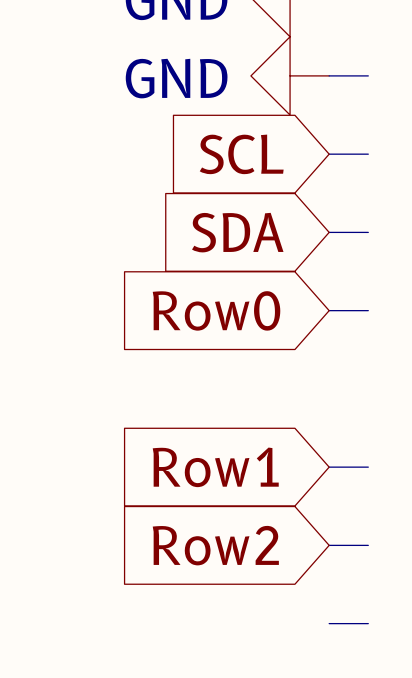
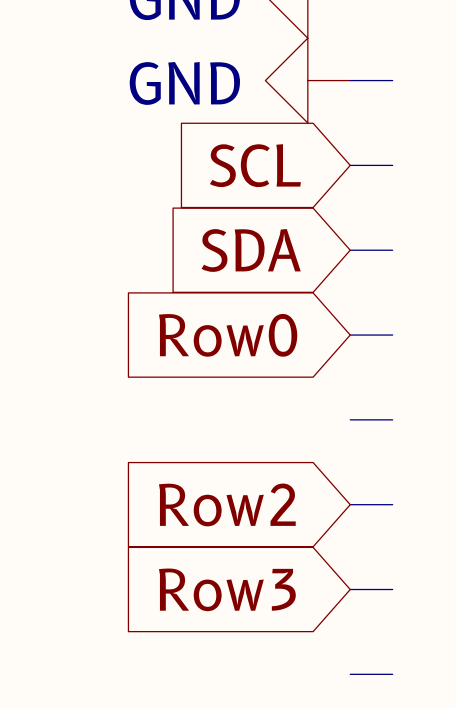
wire: none -> (350, 419) (392, 419)
global label: Row1 (215, 467) -> Row2 (227, 504)
global label: Row2 (215, 545) -> Row3 (227, 589)

